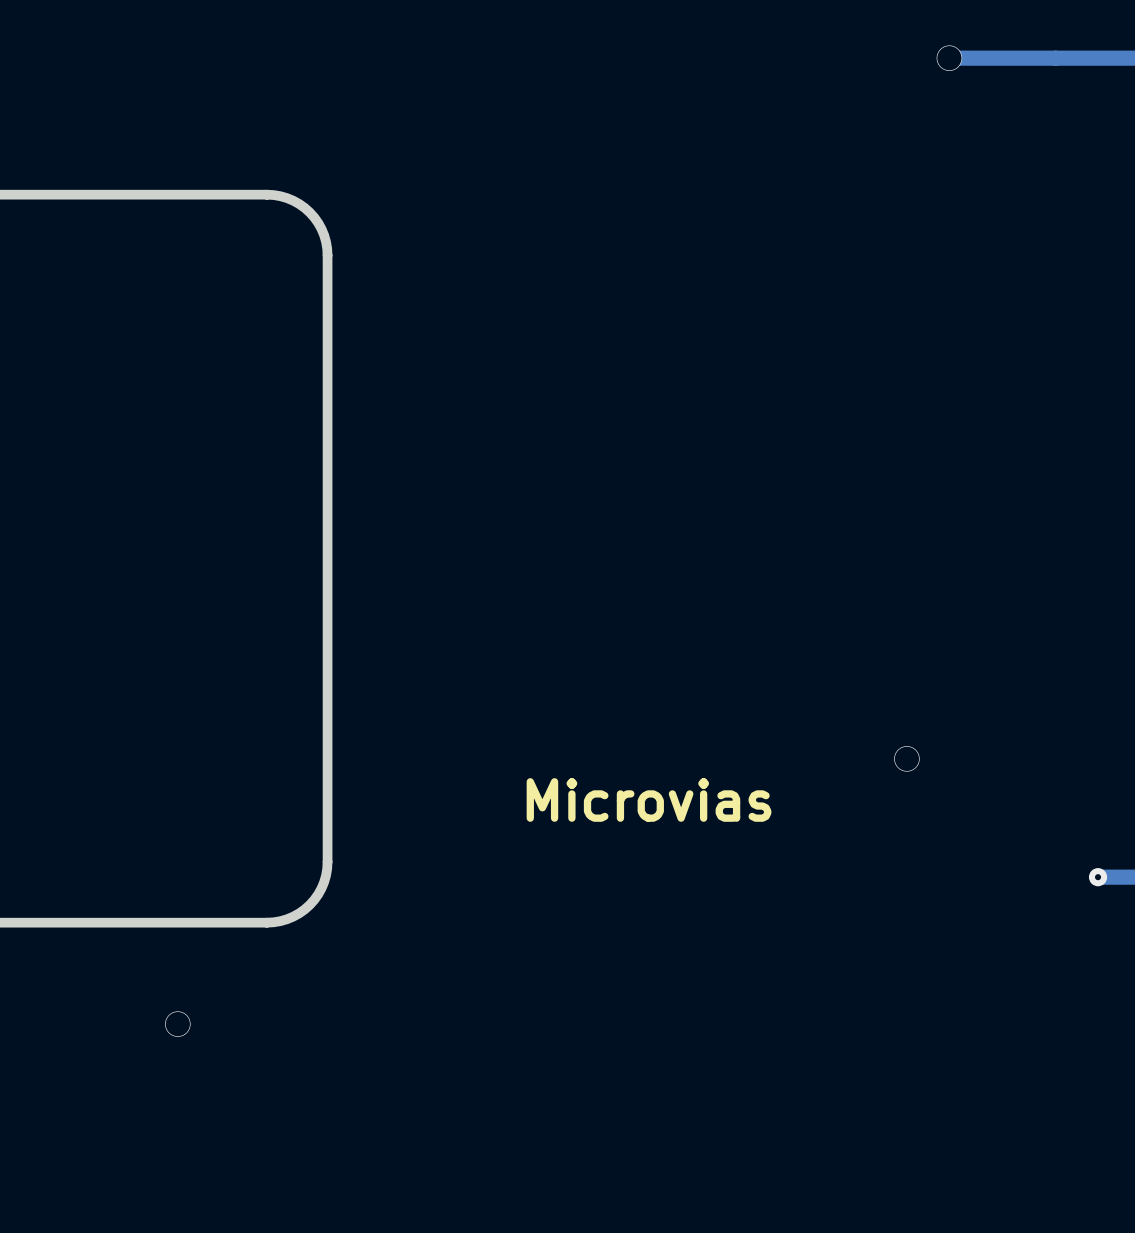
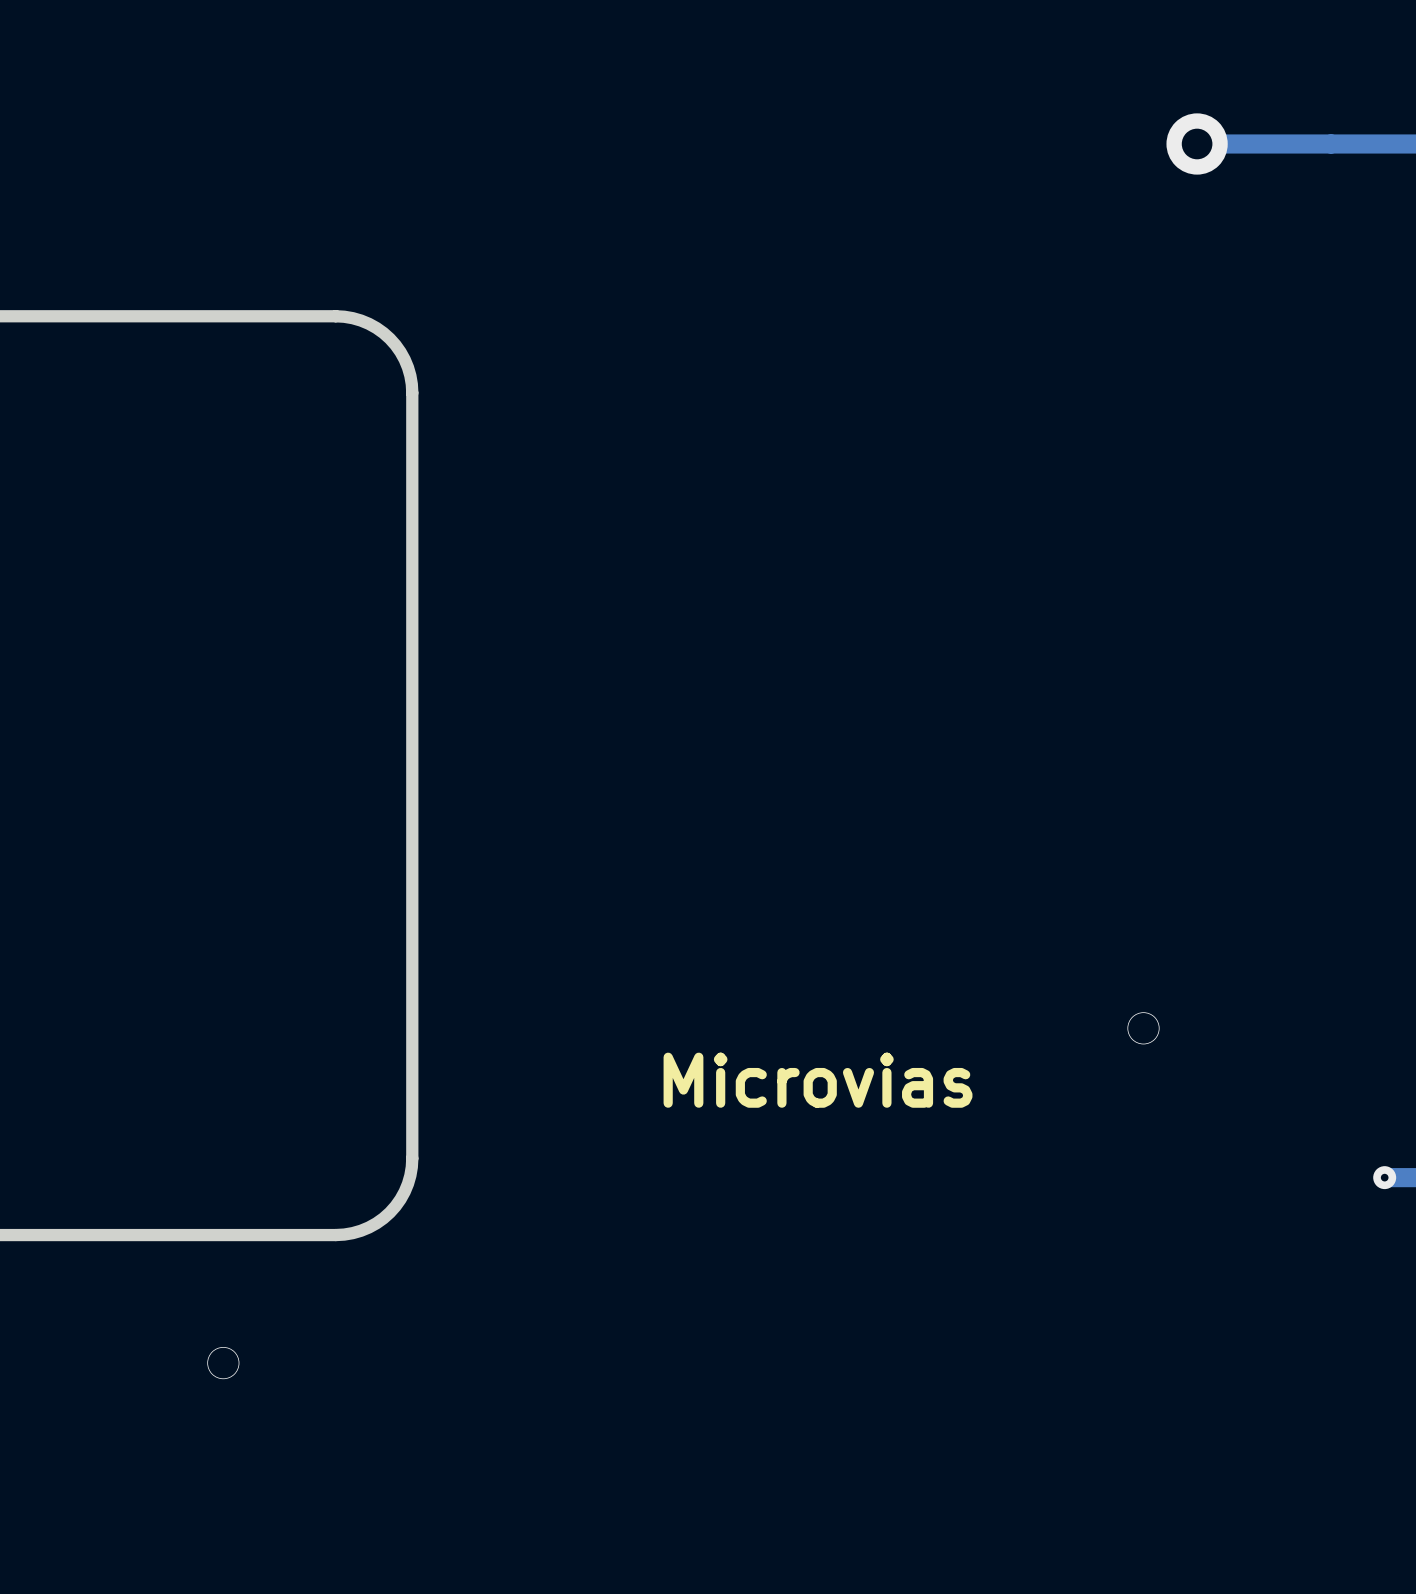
via size: [936, 45, 963, 71] -> [1166, 113, 1228, 175]

